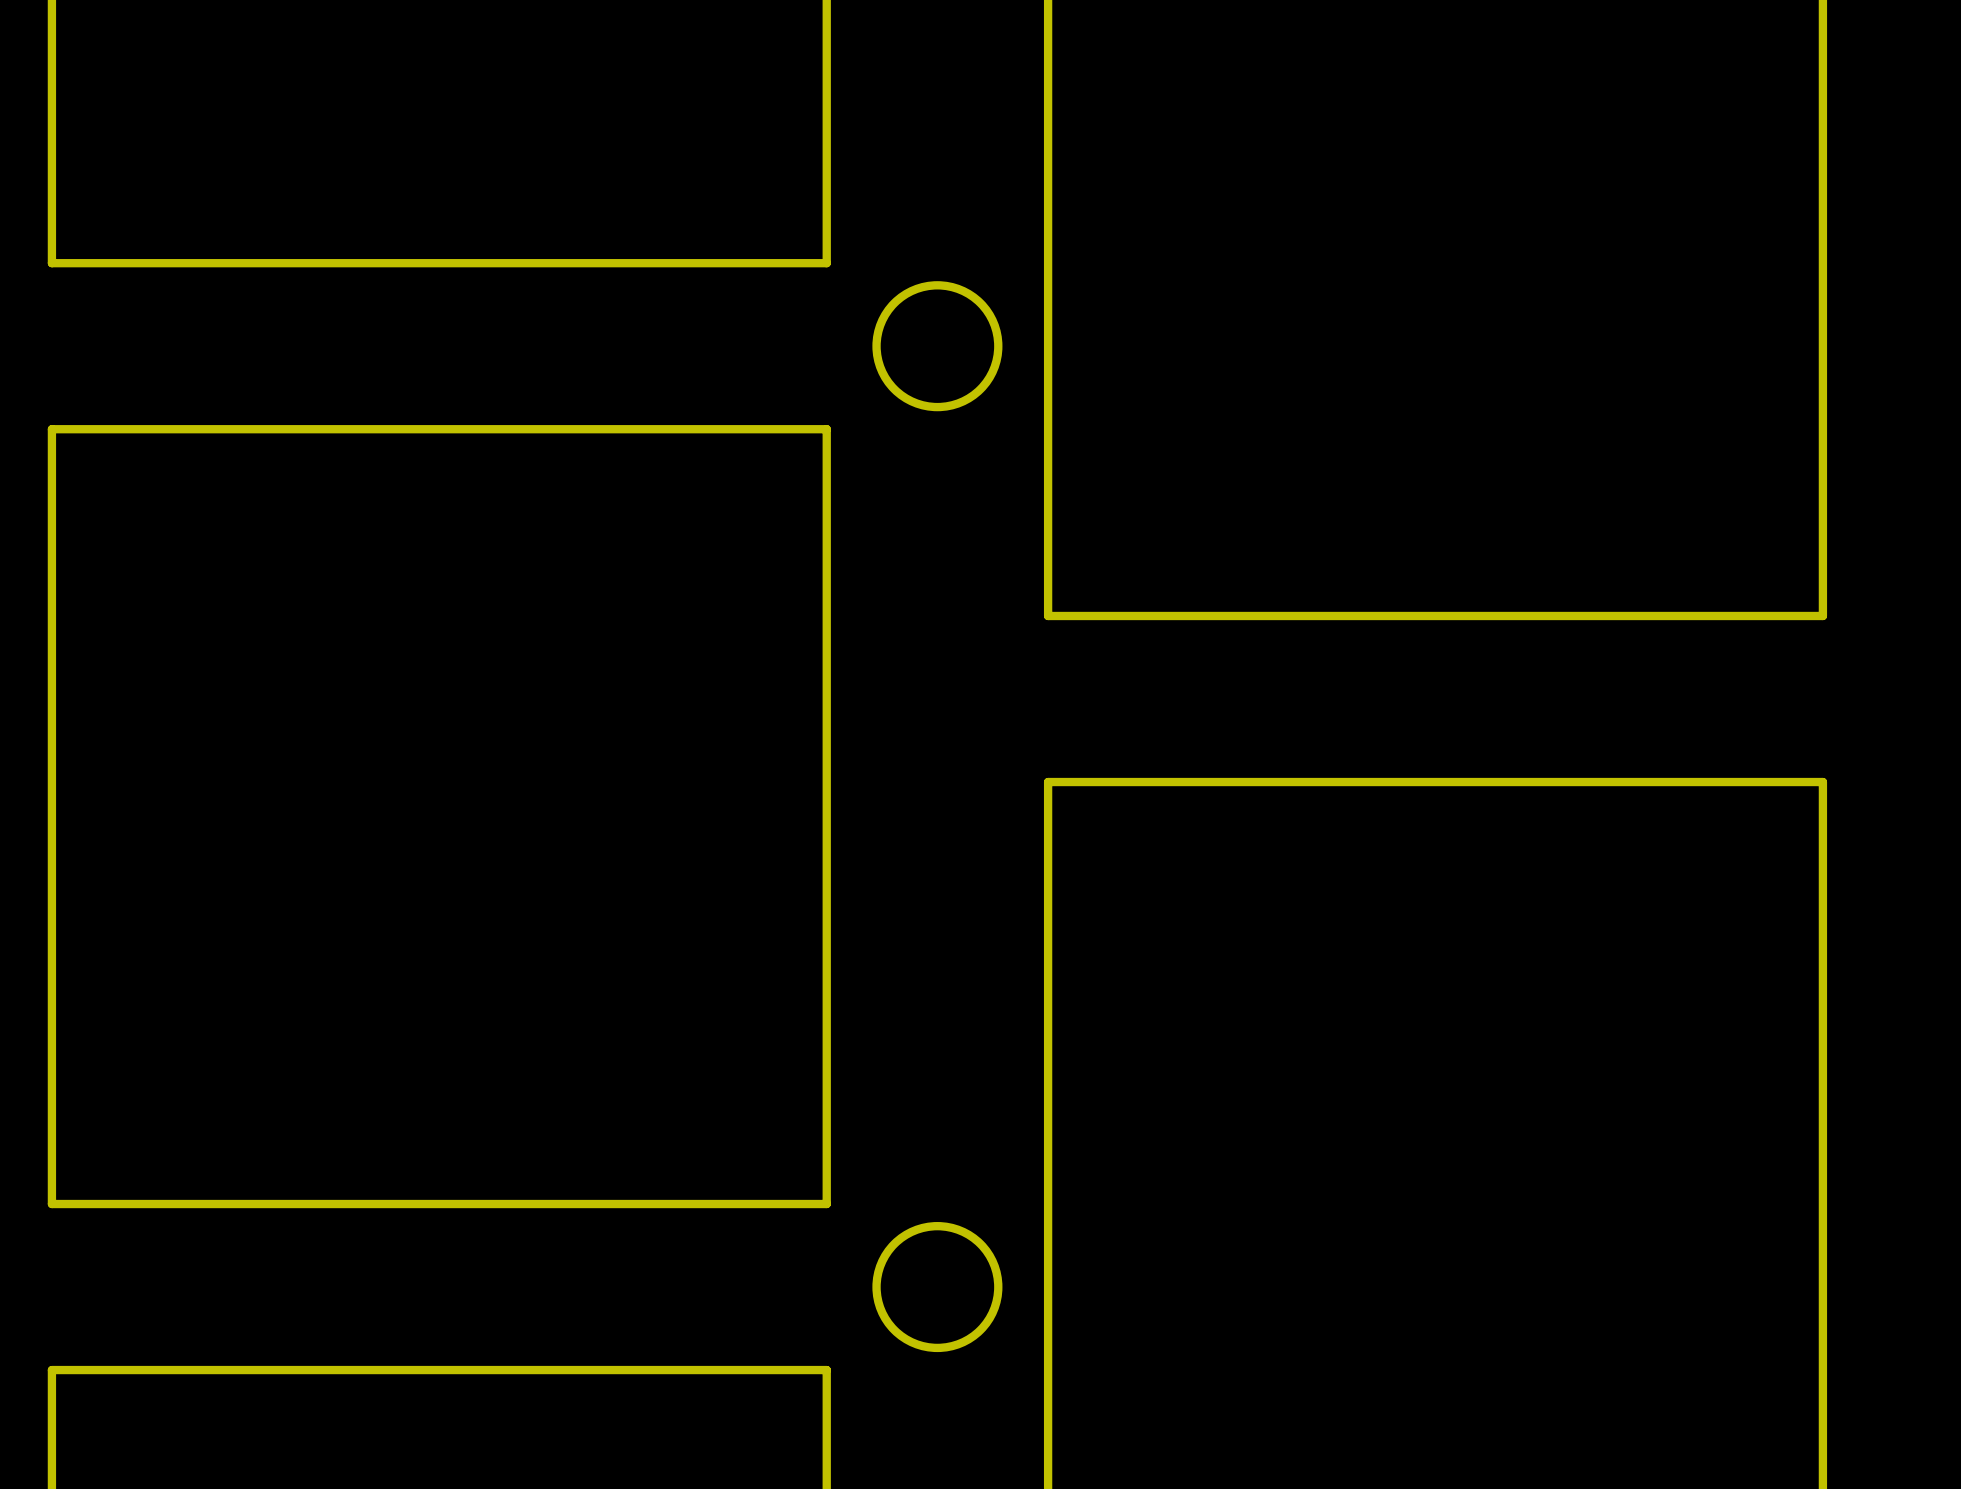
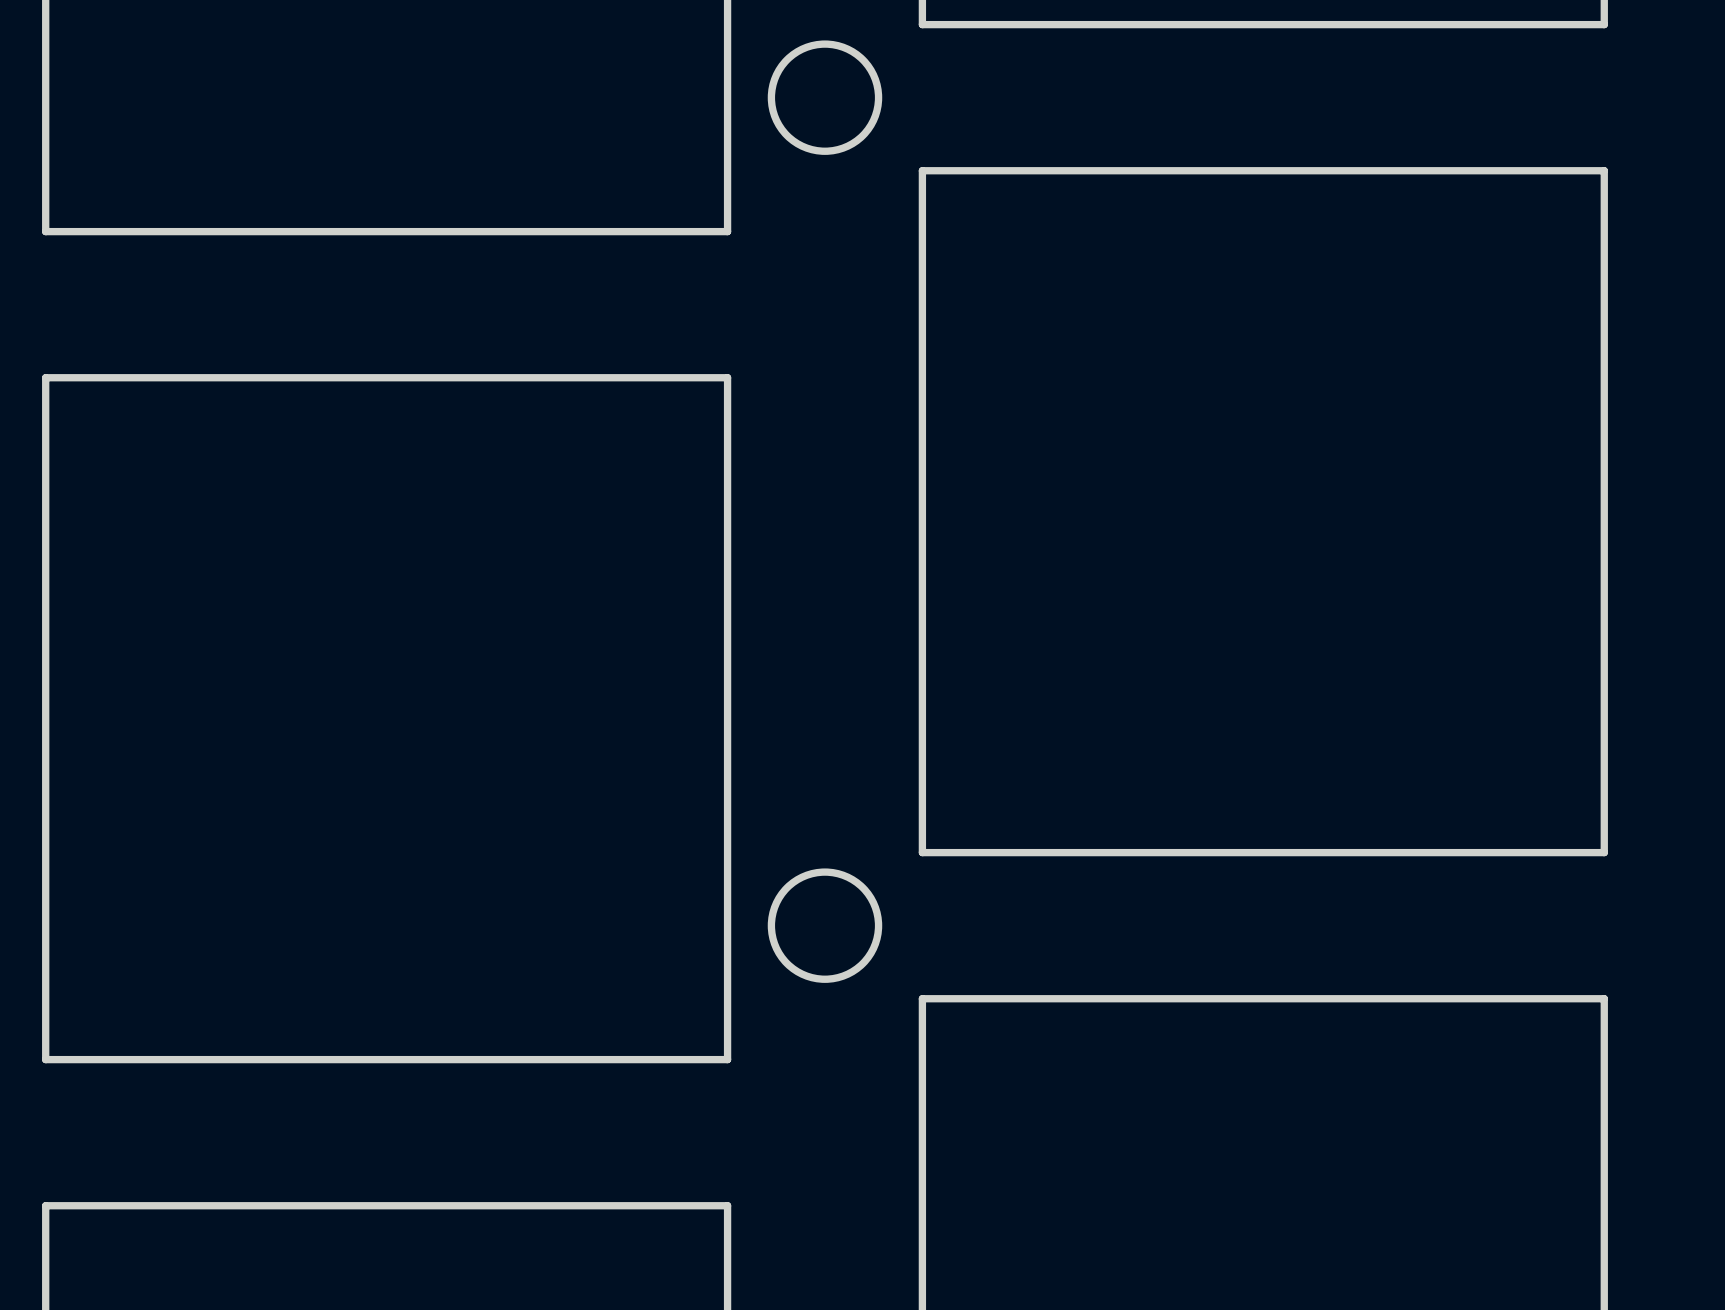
board edge: (1048, 27) (1048, 194) -> (922, 24) (1604, 24)
board edge: (1822, 27) (1822, 194) -> (922, 170) (1604, 170)
round board edge position: (937, 346) -> (824, 97)
board edge: (1048, 615) (1822, 615) -> (922, 542) (922, 688)
board edge: (1048, 782) (1822, 782) -> (1604, 542) (1604, 688)
board edge: (1048, 968) (1048, 1134) -> (922, 852) (1604, 852)
board edge: (1822, 968) (1822, 1134) -> (922, 998) (1604, 998)
round board edge position: (937, 1287) -> (824, 925)

